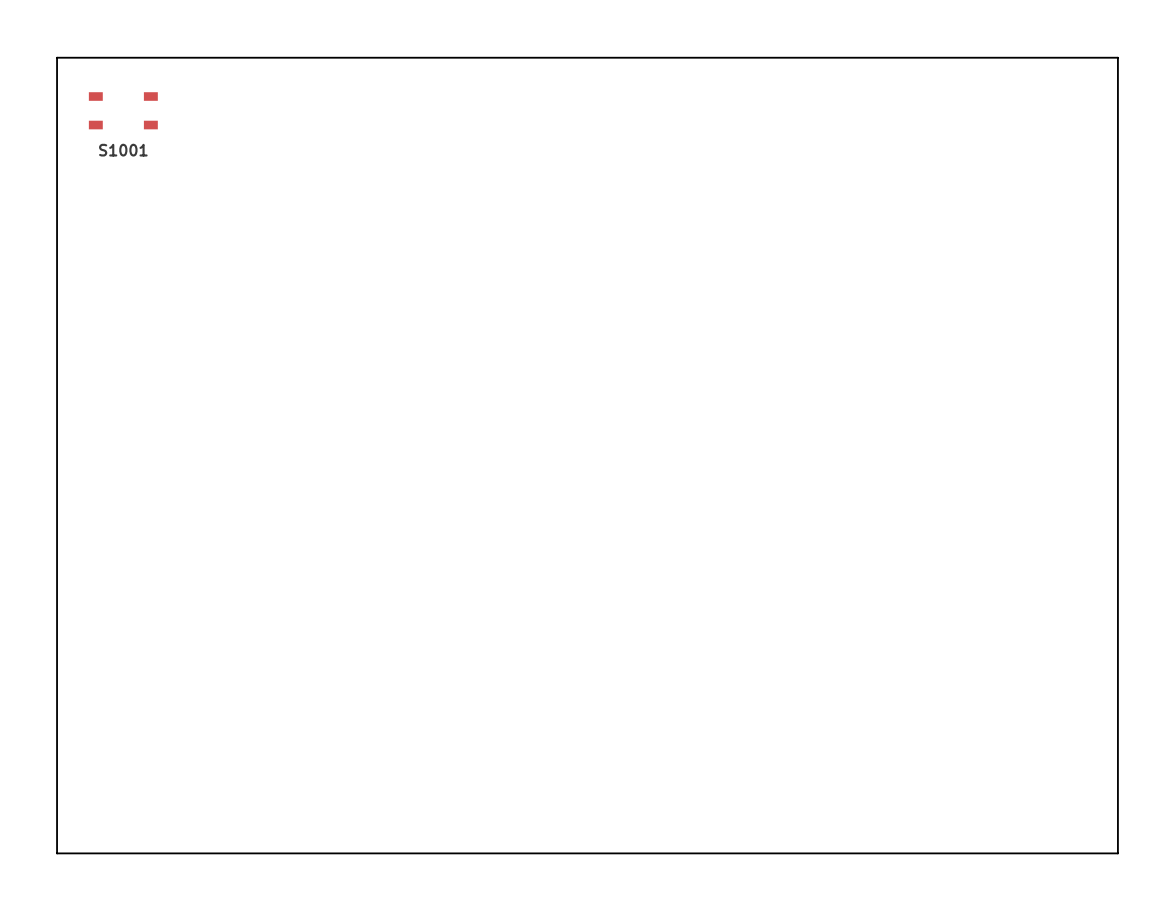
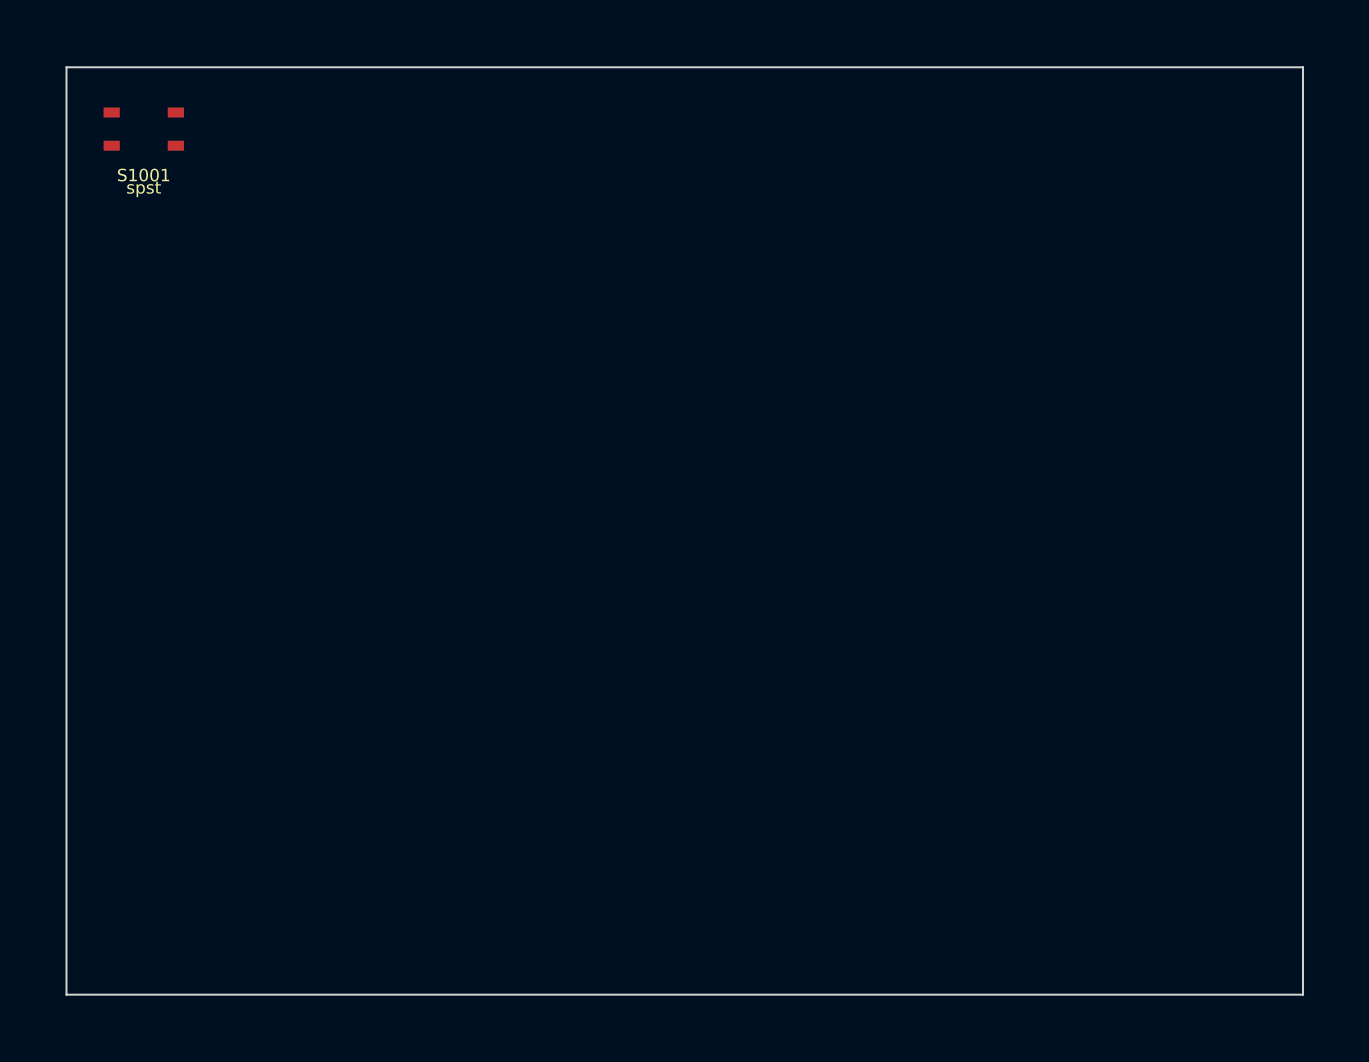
S1001 value: none -> spst (144, 189)

